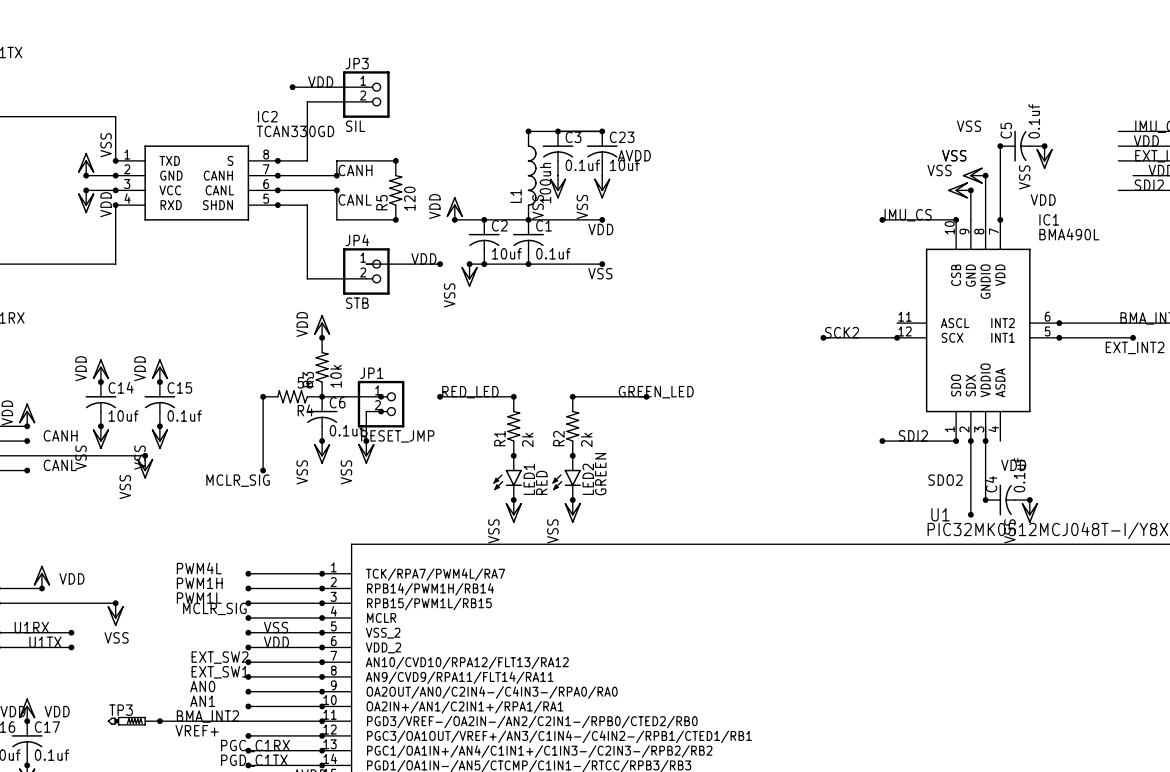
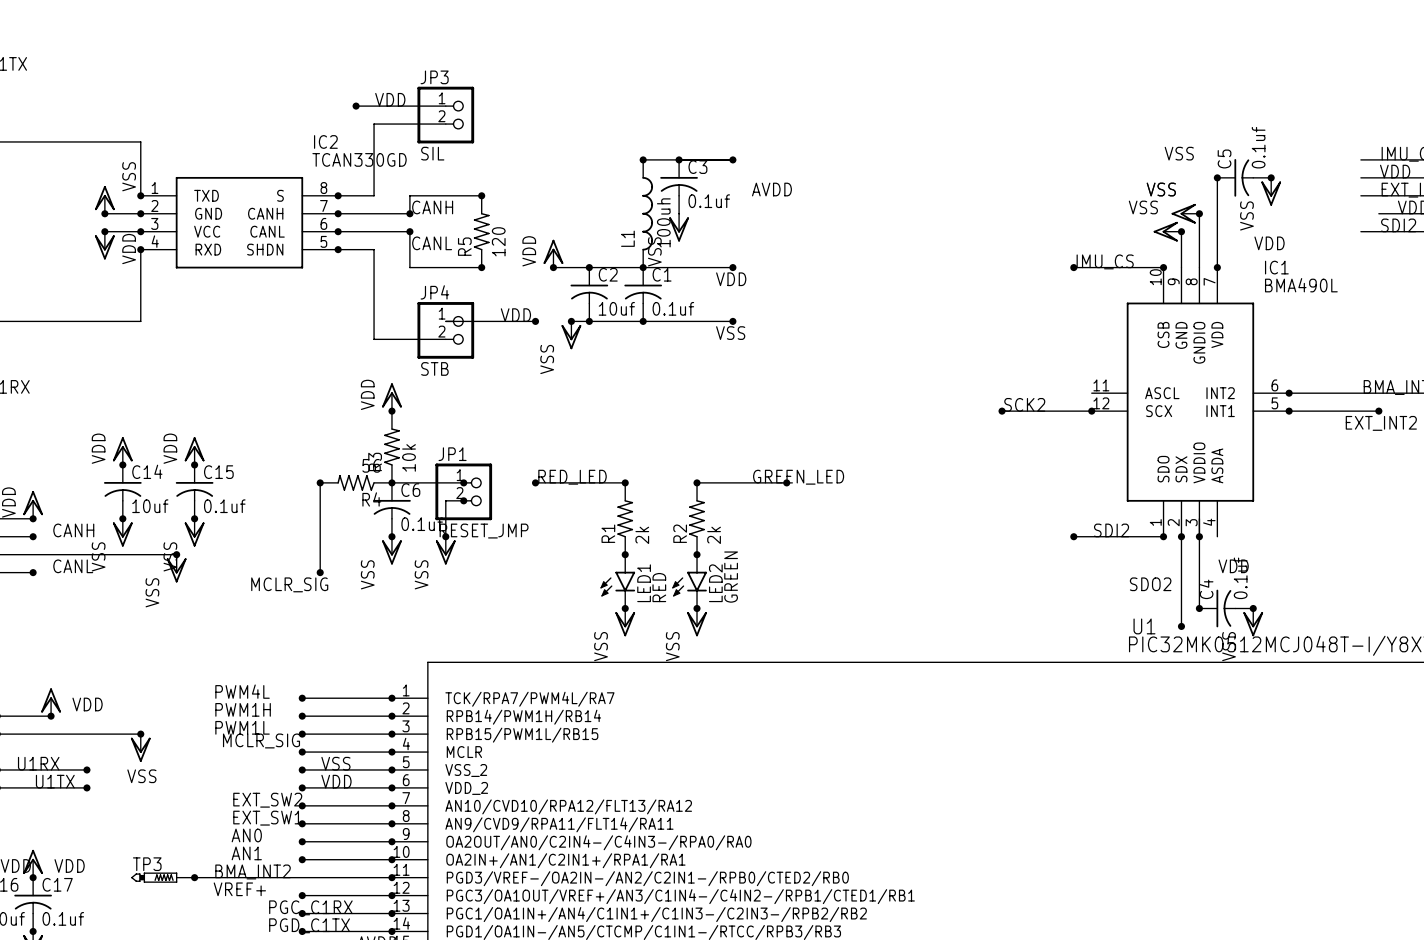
C23: 10uf (602, 153) -> none
power symbol: VSS (602, 187) -> none

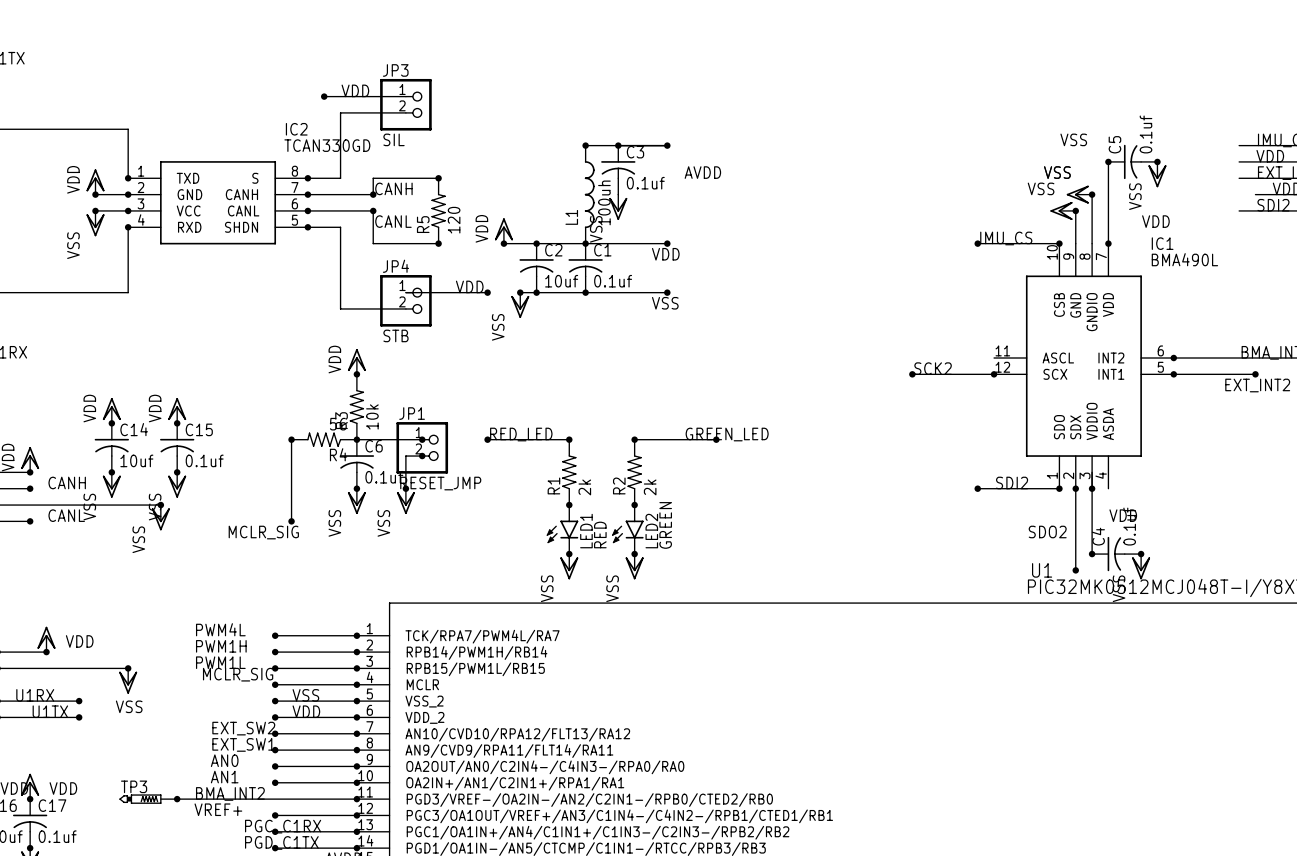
power symbol: VSS (104, 199) -> VDD (95, 181)
power symbol: VDD (104, 245) -> VSS (95, 223)

